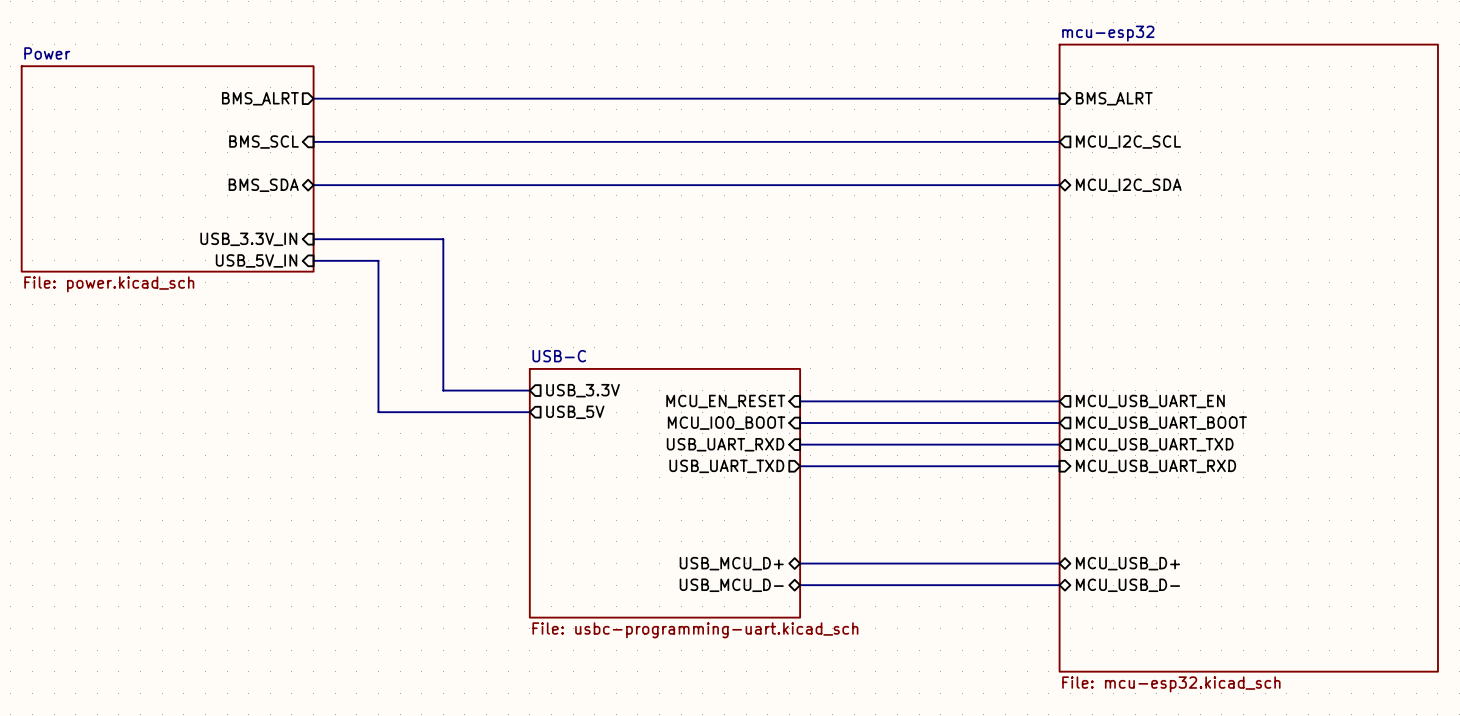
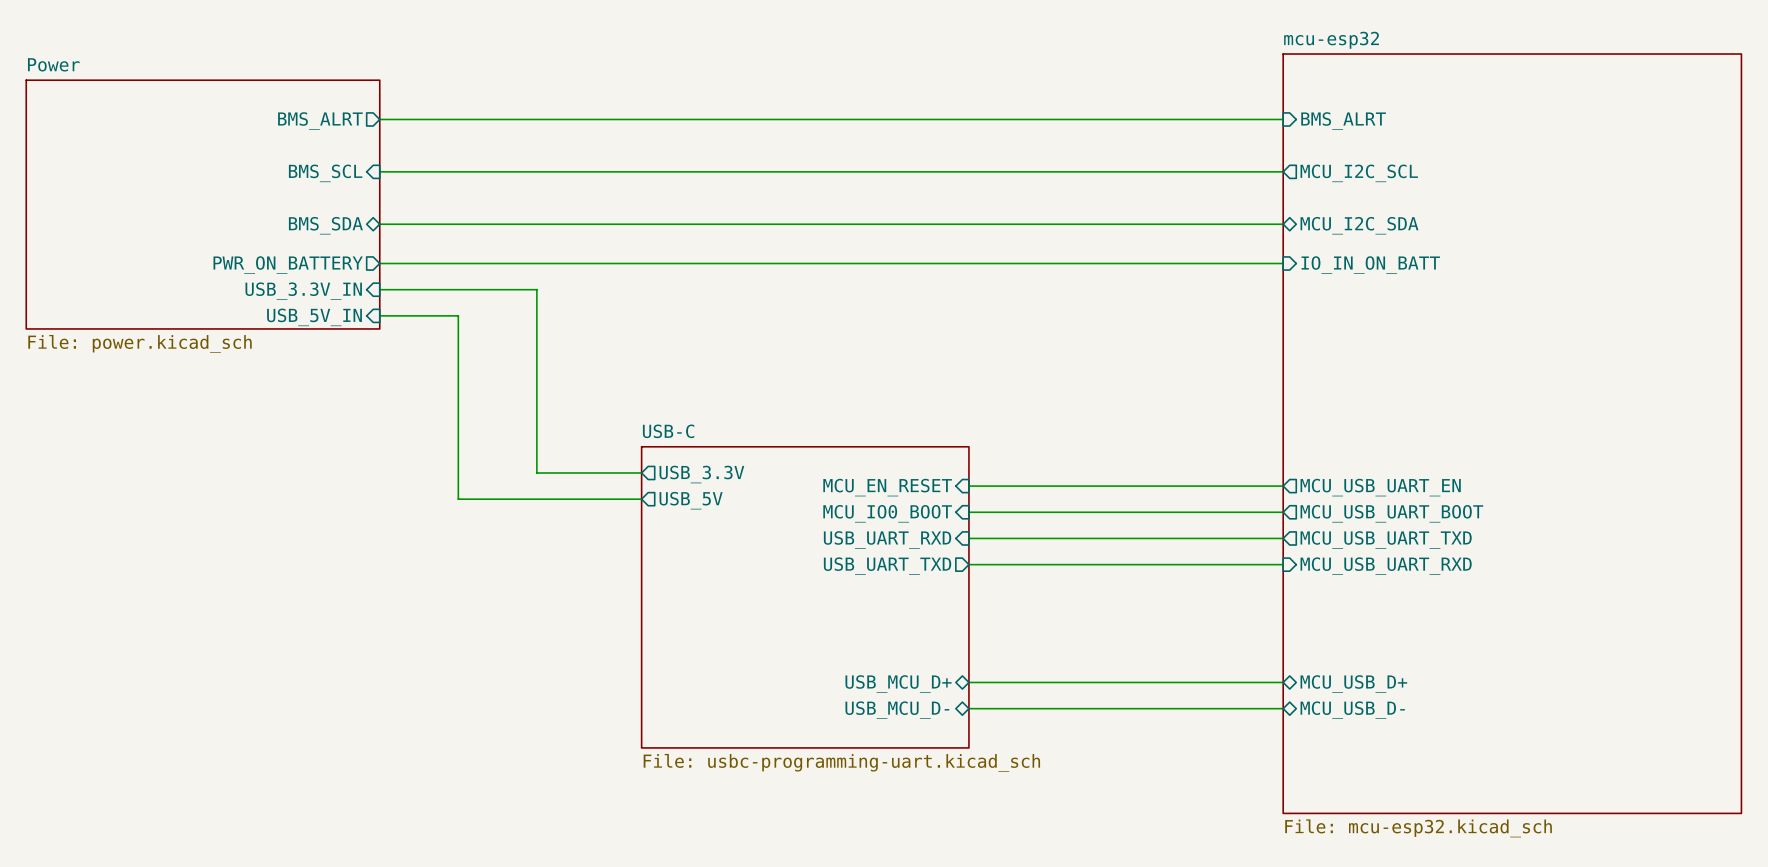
sheet pin: none -> PWR_ON_BATTERY (288, 265)
wire: none -> (379, 263) (1283, 263)
sheet pin: none -> IO_IN_ON_BATT (1370, 265)

